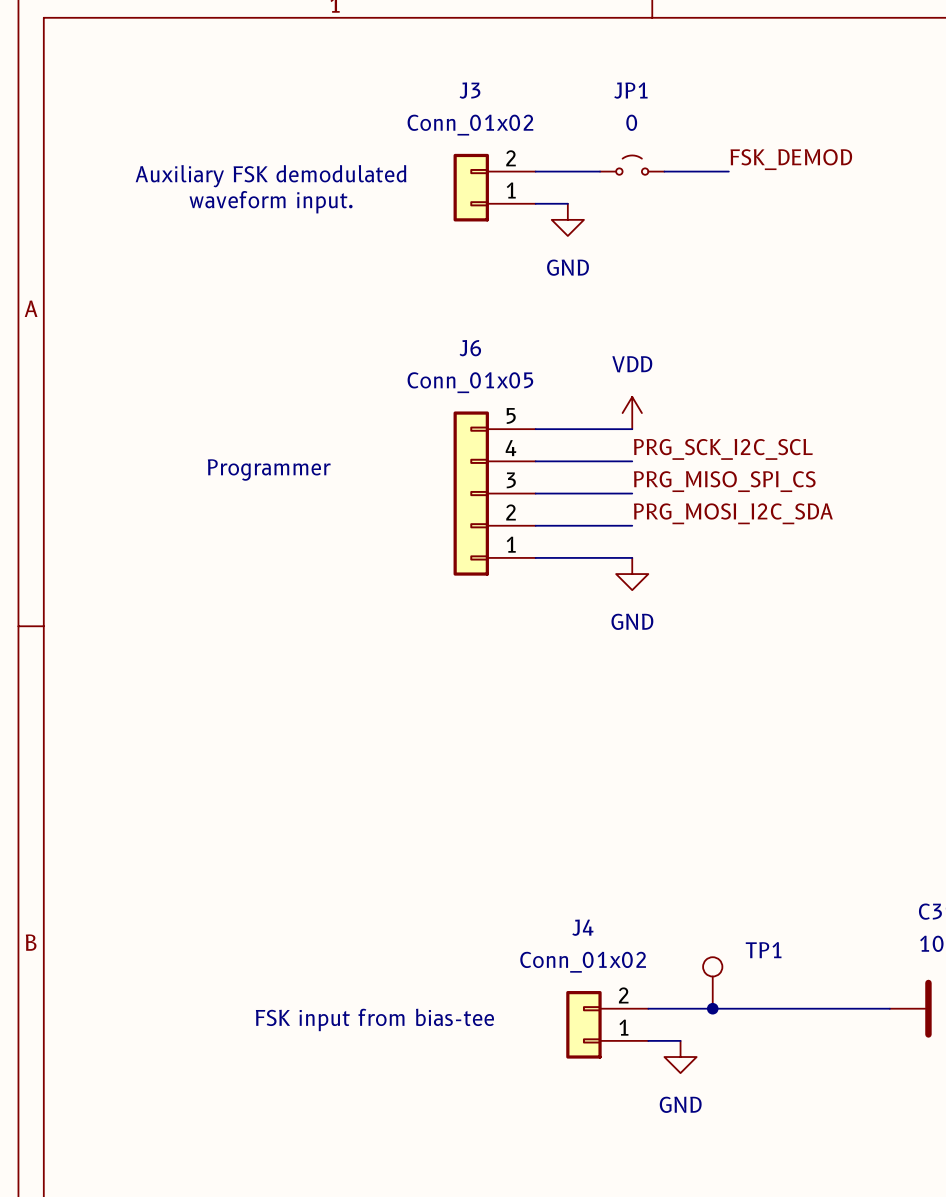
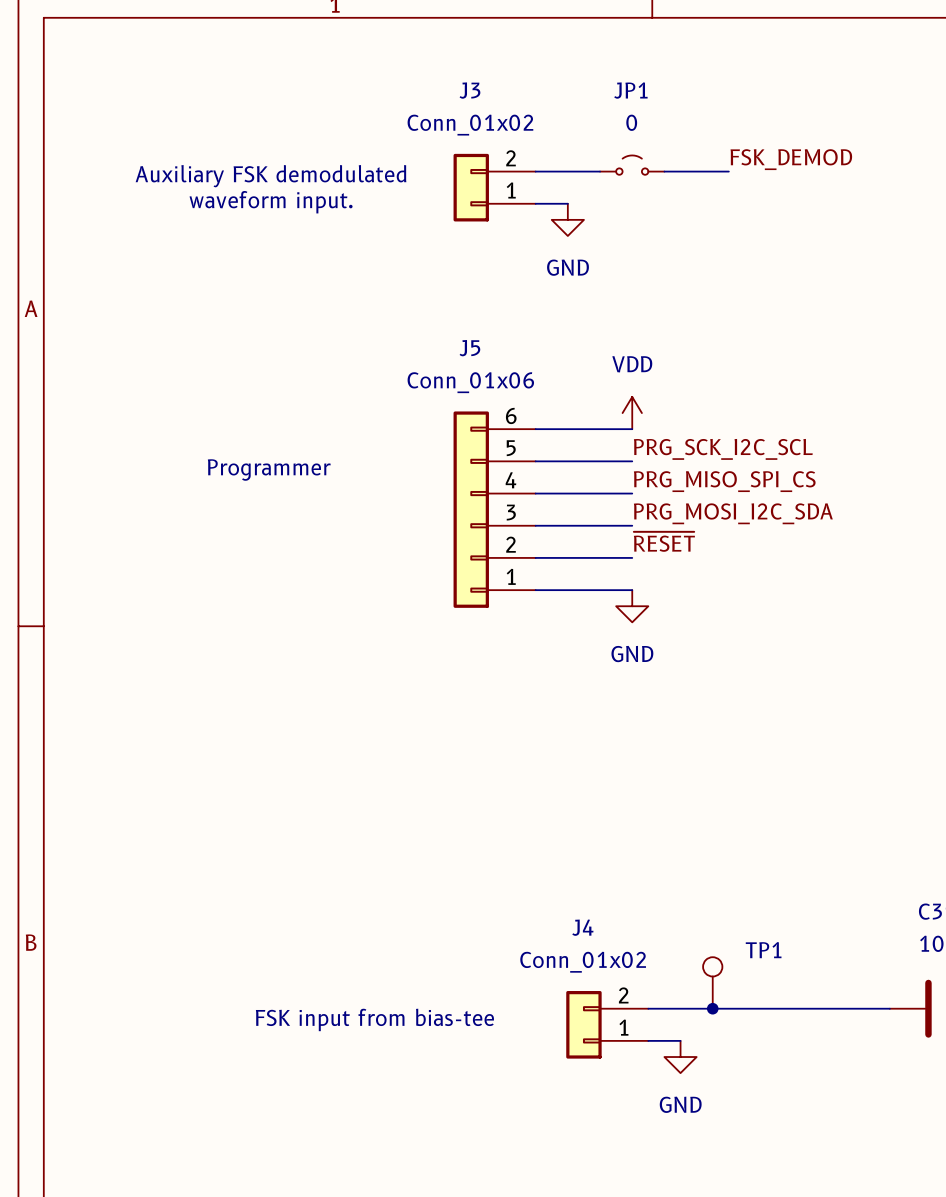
J6: Conn_01x05 (494, 493) -> none
J5: none -> Conn_01x06 (494, 509)
label: none -> ~{RESET} (664, 541)
power symbol position: GND (632, 574) -> GND (632, 606)
wire: none -> (535, 590) (632, 590)

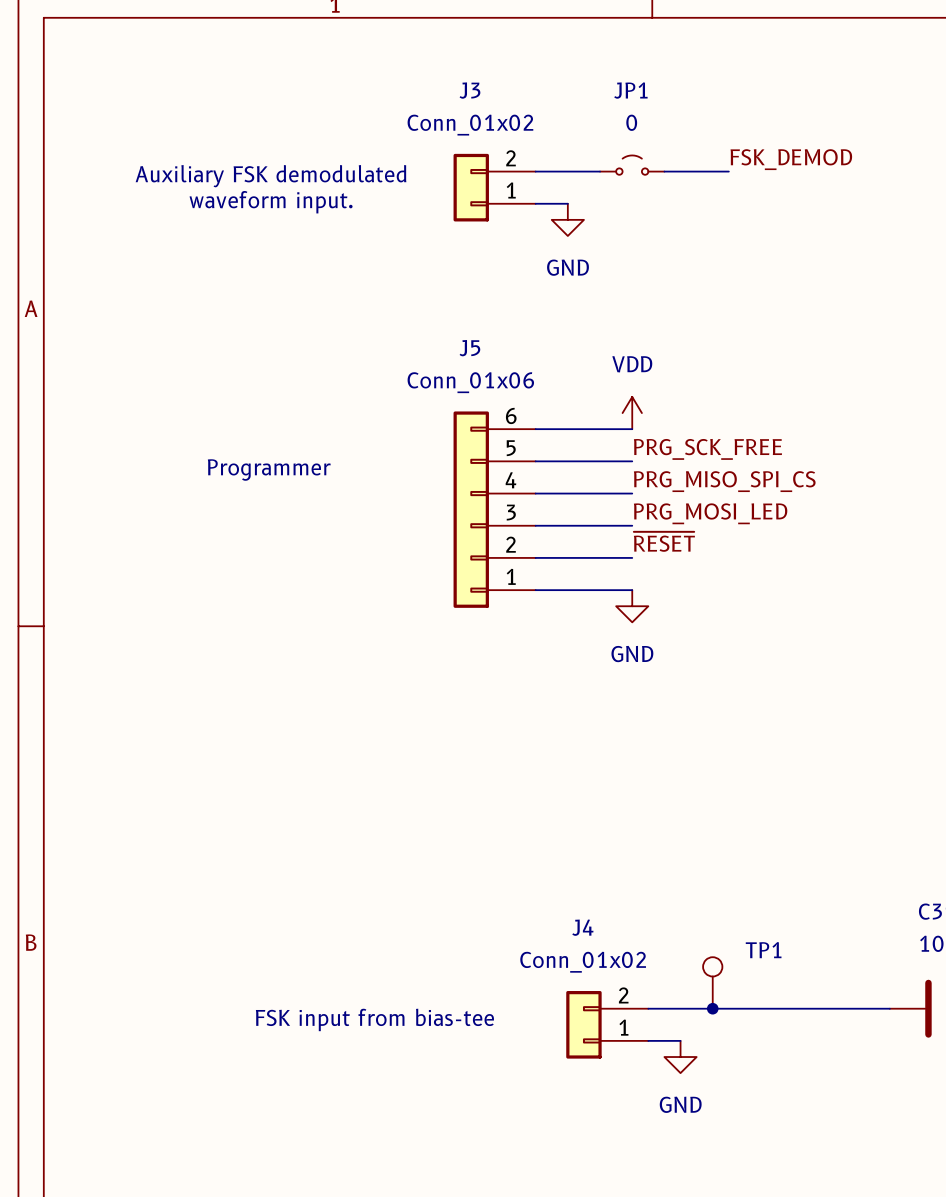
label: PRG_SCK_I2C_SCL (723, 449) -> PRG_SCK_FREE (707, 449)
label: PRG_MOSI_I2C_SDA (733, 513) -> PRG_MOSI_LED (710, 513)

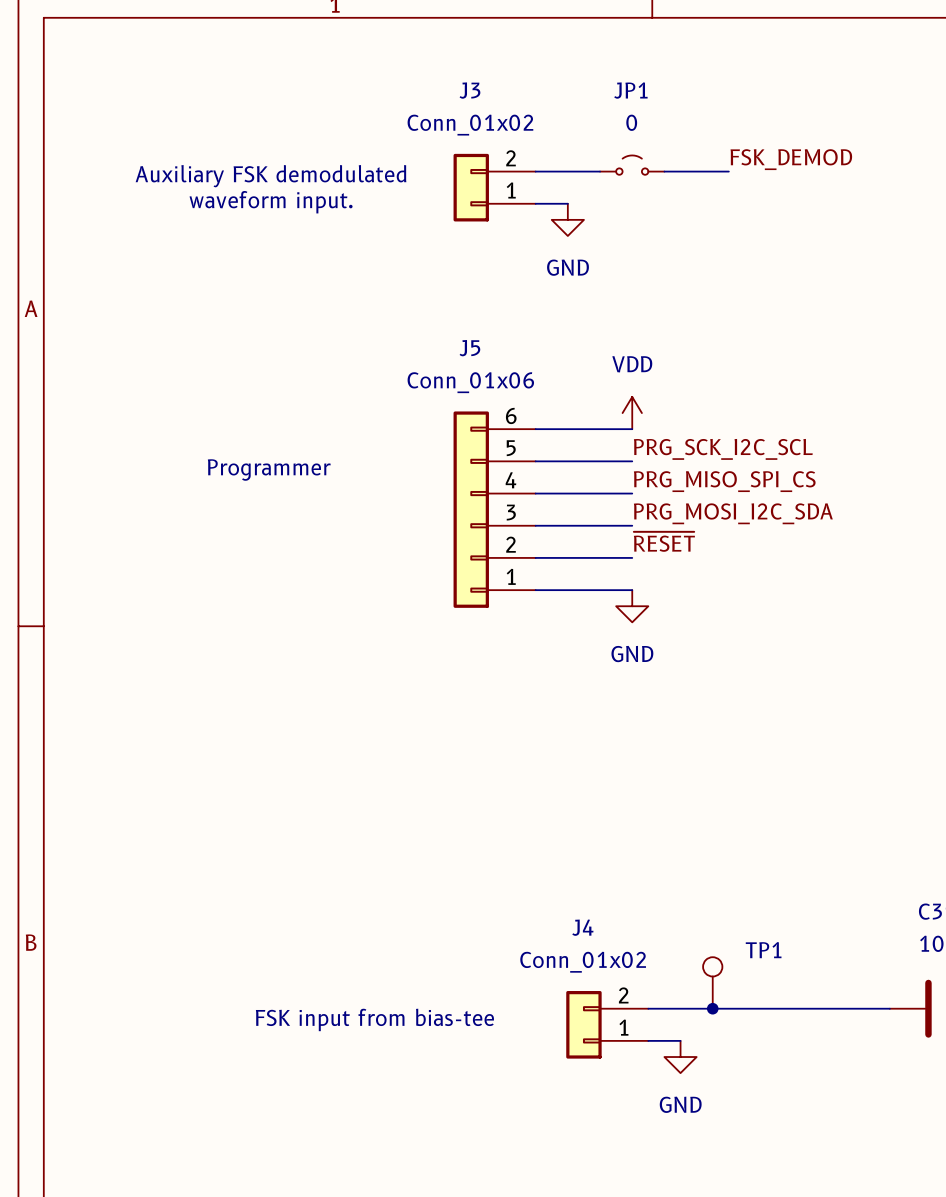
label: PRG_SCK_FREE (707, 449) -> PRG_SCK_I2C_SCL (723, 449)
label: PRG_MOSI_LED (710, 513) -> PRG_MOSI_I2C_SDA (733, 513)

